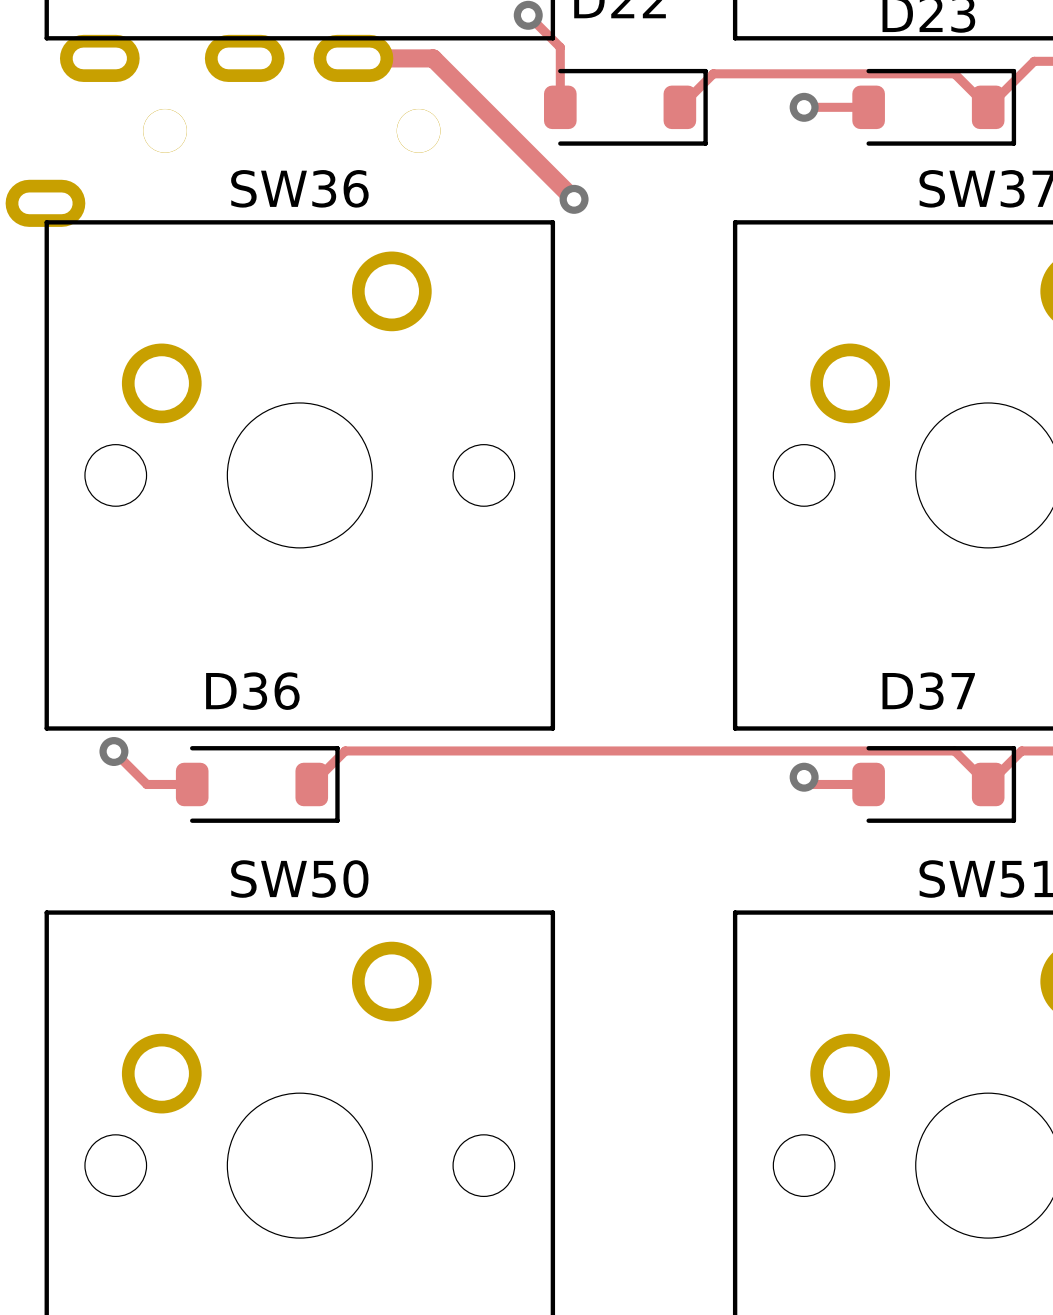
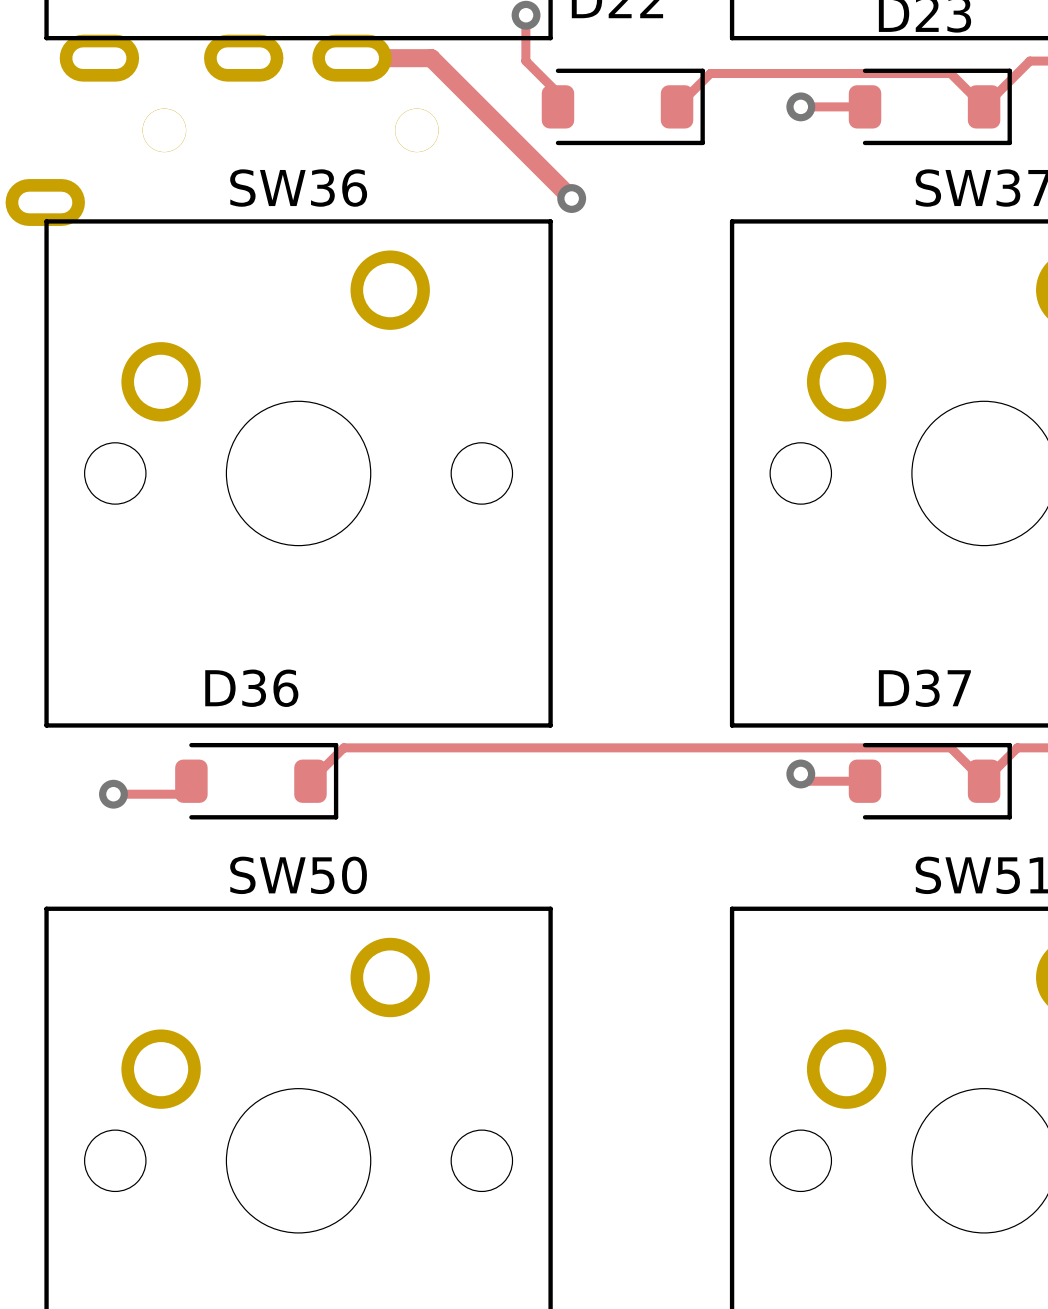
track: (528, 15) (560, 47) (560, 93) -> (525, 15) (525, 61) (557, 93)
track: (113, 751) (146, 784) (192, 784) -> (113, 794) (178, 794) (191, 781)
via position: (113, 751) -> (113, 794)

